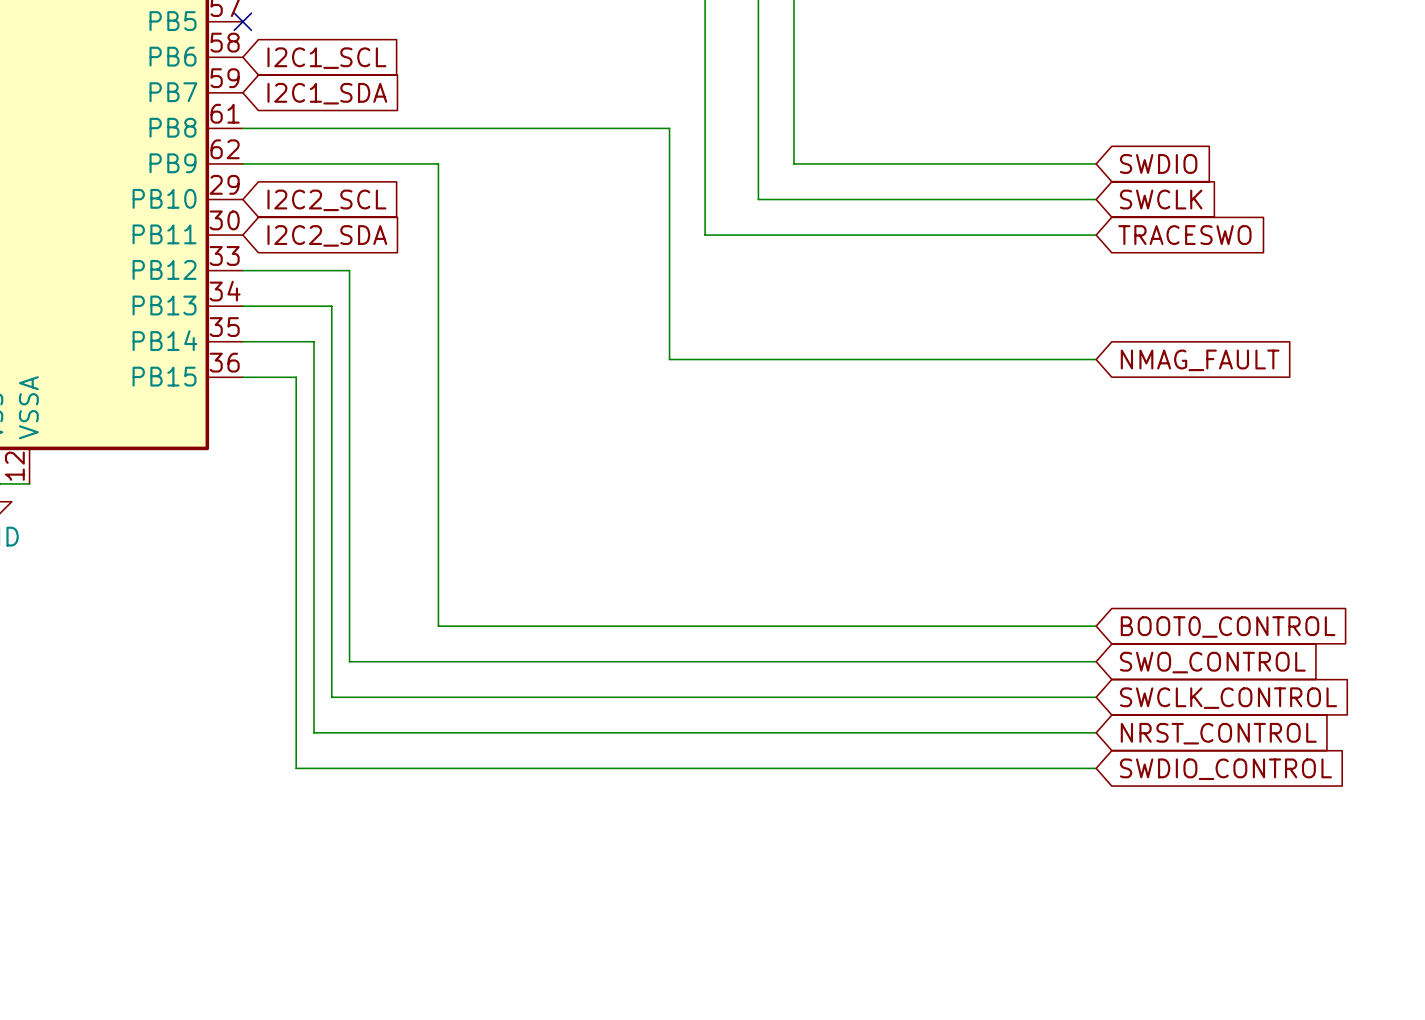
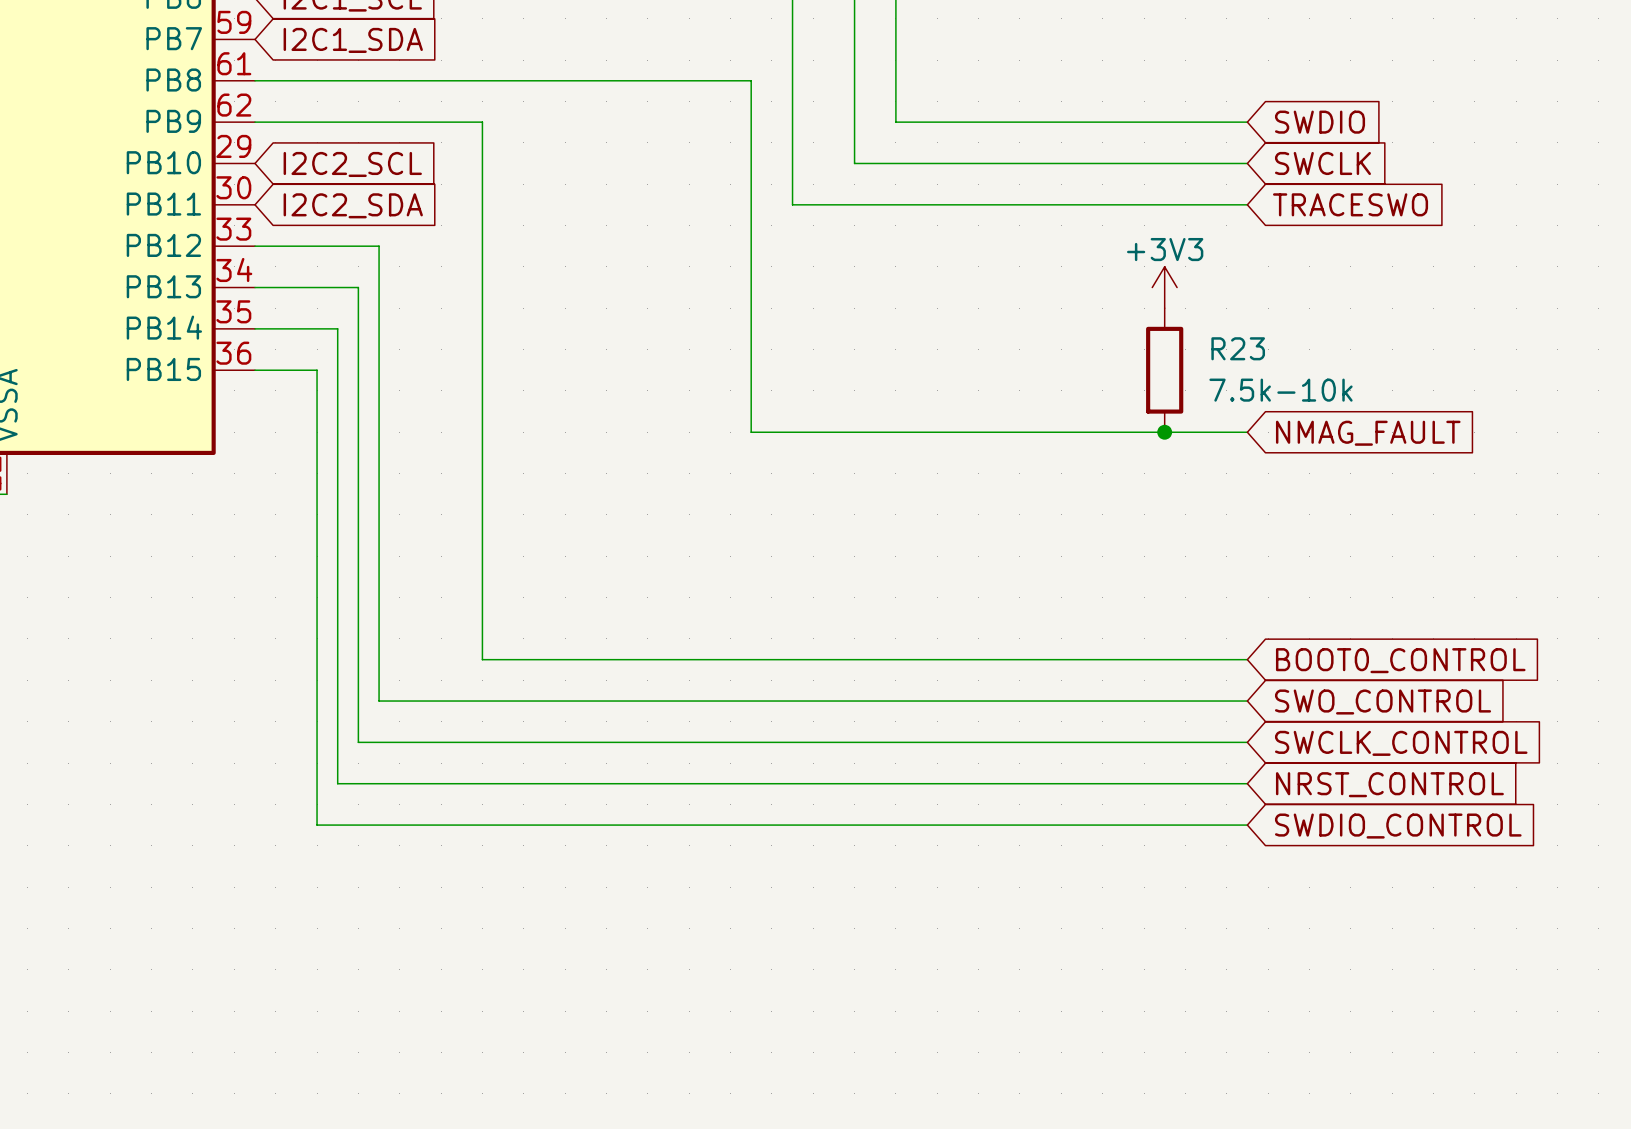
power symbol: none -> +3V3 (1164, 287)
wire: (669, 359) (1096, 359) -> (751, 349) (751, 432) (1247, 432)
global label position: NMAG_FAULT (1200, 360) -> NMAG_FAULT (1368, 433)
R23: none -> 7.5k-10k (1164, 370)
junction: none -> (1164, 432)

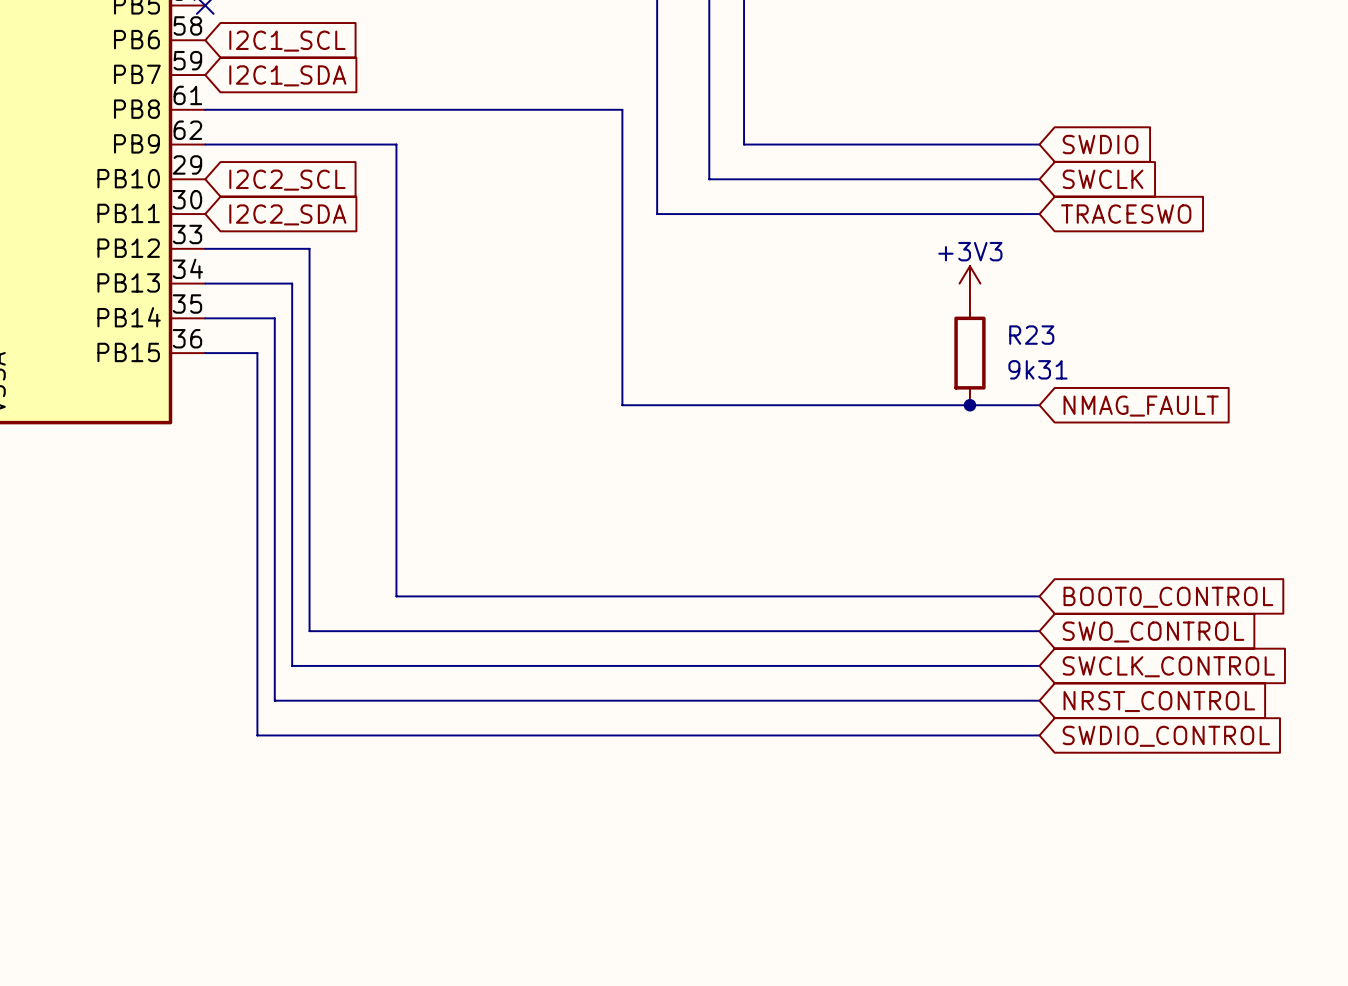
R23 value: 7.5k-10k (1281, 390) -> 9k31 (1037, 369)

